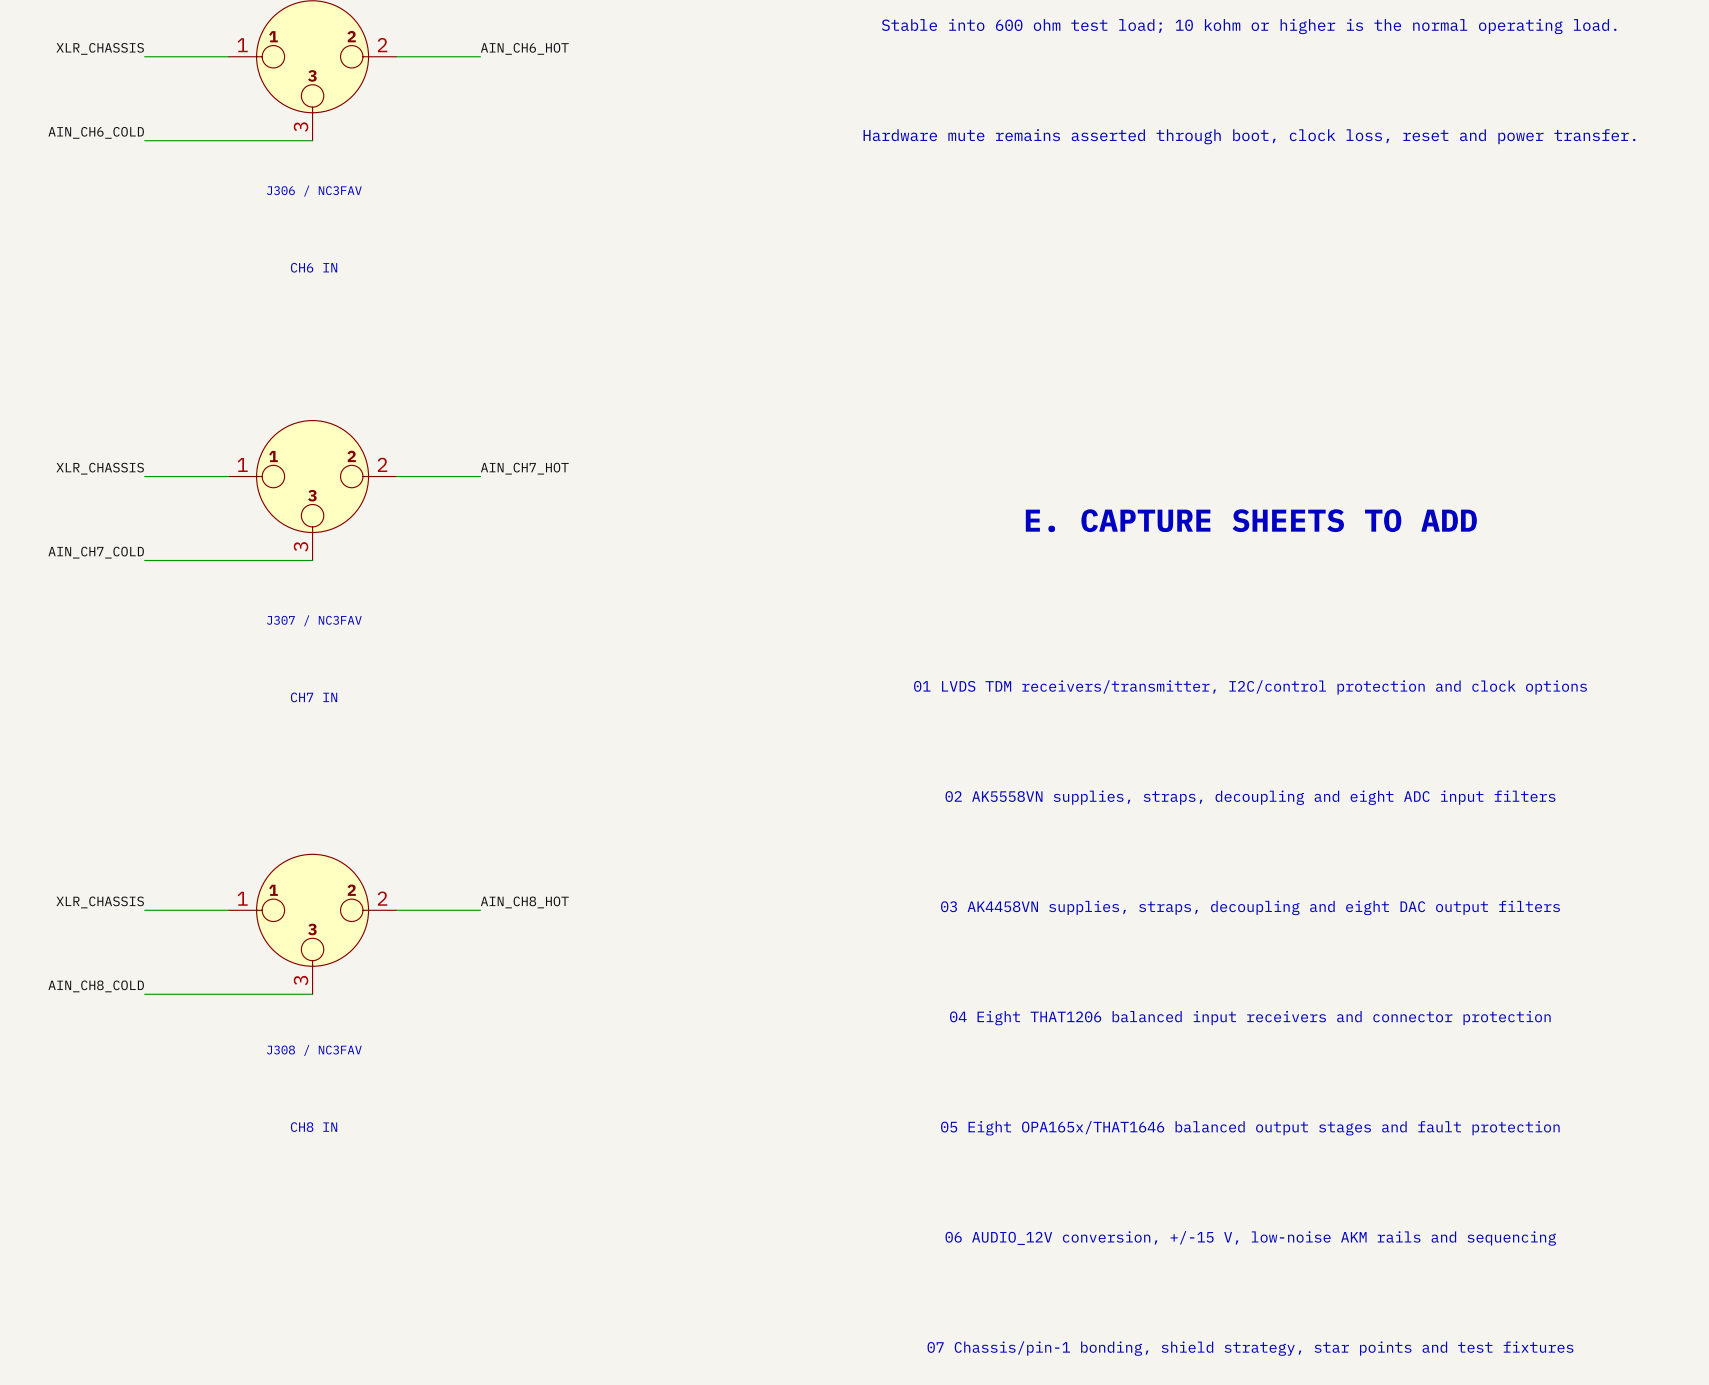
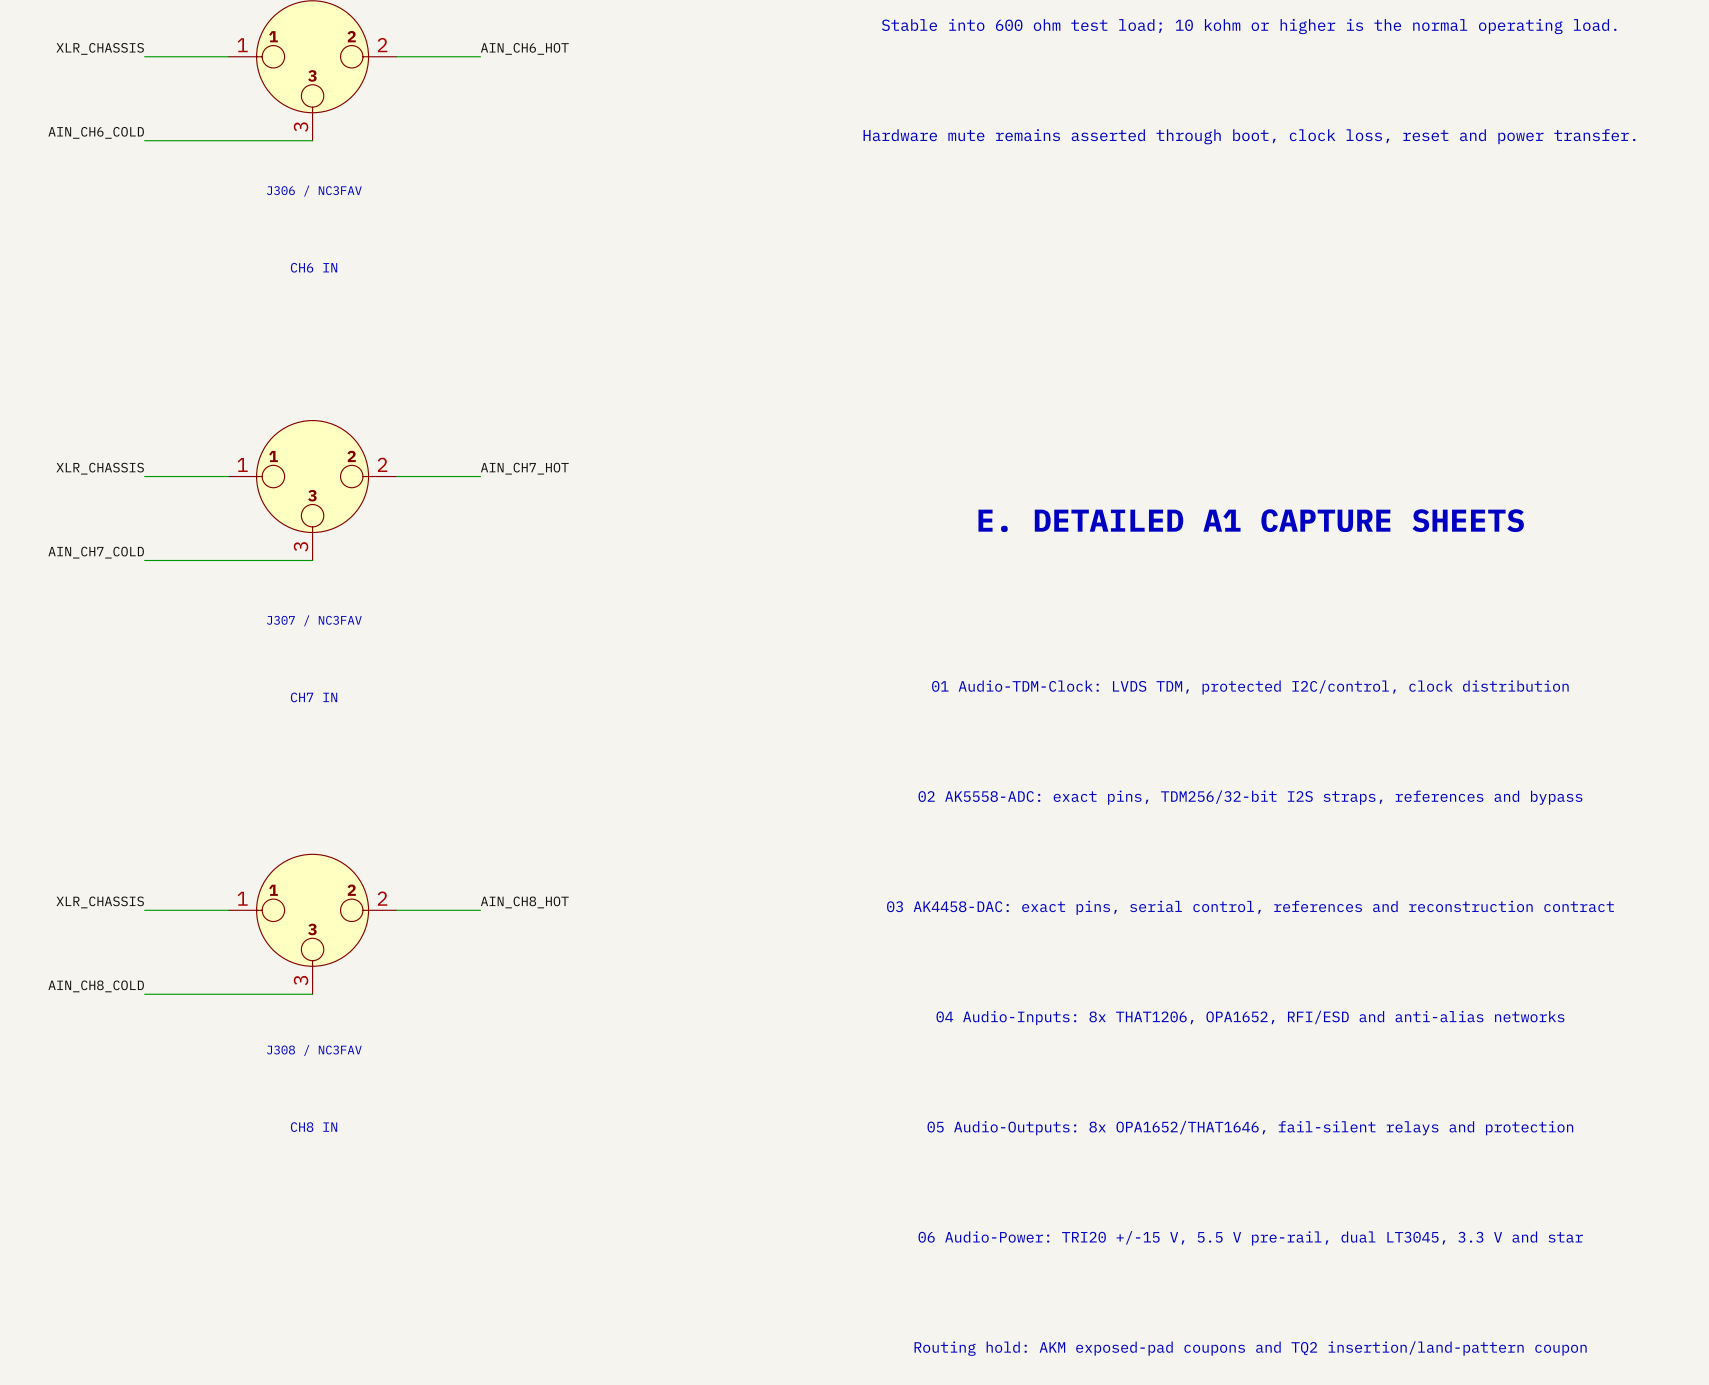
text: E. CAPTURE SHEETS TO ADD (1251, 520) -> E. DETAILED A1 CAPTURE SHEETS (1251, 520)
text: 01 LVDS TDM receivers/transmitter, I2C/control protection and clock options (1250, 687) -> 01 Audio-TDM-Clock: LVDS TDM, protected I2C/control, clock distribution (1250, 687)
text: 02 AK5558VN supplies, straps, decoupling and eight ADC input filters (1250, 797) -> 02 AK5558-ADC: exact pins, TDM256/32-bit I2S straps, references and bypass (1250, 797)
text: 03 AK4458VN supplies, straps, decoupling and eight DAC output filters (1250, 907) -> 03 AK4458-DAC: exact pins, serial control, references and reconstruction contract (1250, 907)
text: 04 Eight THAT1206 balanced input receivers and connector protection (1250, 1018) -> 04 Audio-Inputs: 8x THAT1206, OPA1652, RFI/ESD and anti-alias networks (1250, 1017)
text: 05 Eight OPA165x/THAT1646 balanced output stages and fault protection (1250, 1128) -> 05 Audio-Outputs: 8x OPA1652/THAT1646, fail-silent relays and protection (1250, 1128)
text: 06 AUDIO_12V conversion, +/-15 V, low-noise AKM rails and sequencing (1250, 1238) -> 06 Audio-Power: TRI20 +/-15 V, 5.5 V pre-rail, dual LT3045, 3.3 V and star (1250, 1238)
text: 07 Chassis/pin-1 bonding, shield strategy, star points and test fixtures (1250, 1348) -> Routing hold: AKM exposed-pad coupons and TQ2 insertion/land-pattern coupon (1250, 1348)

